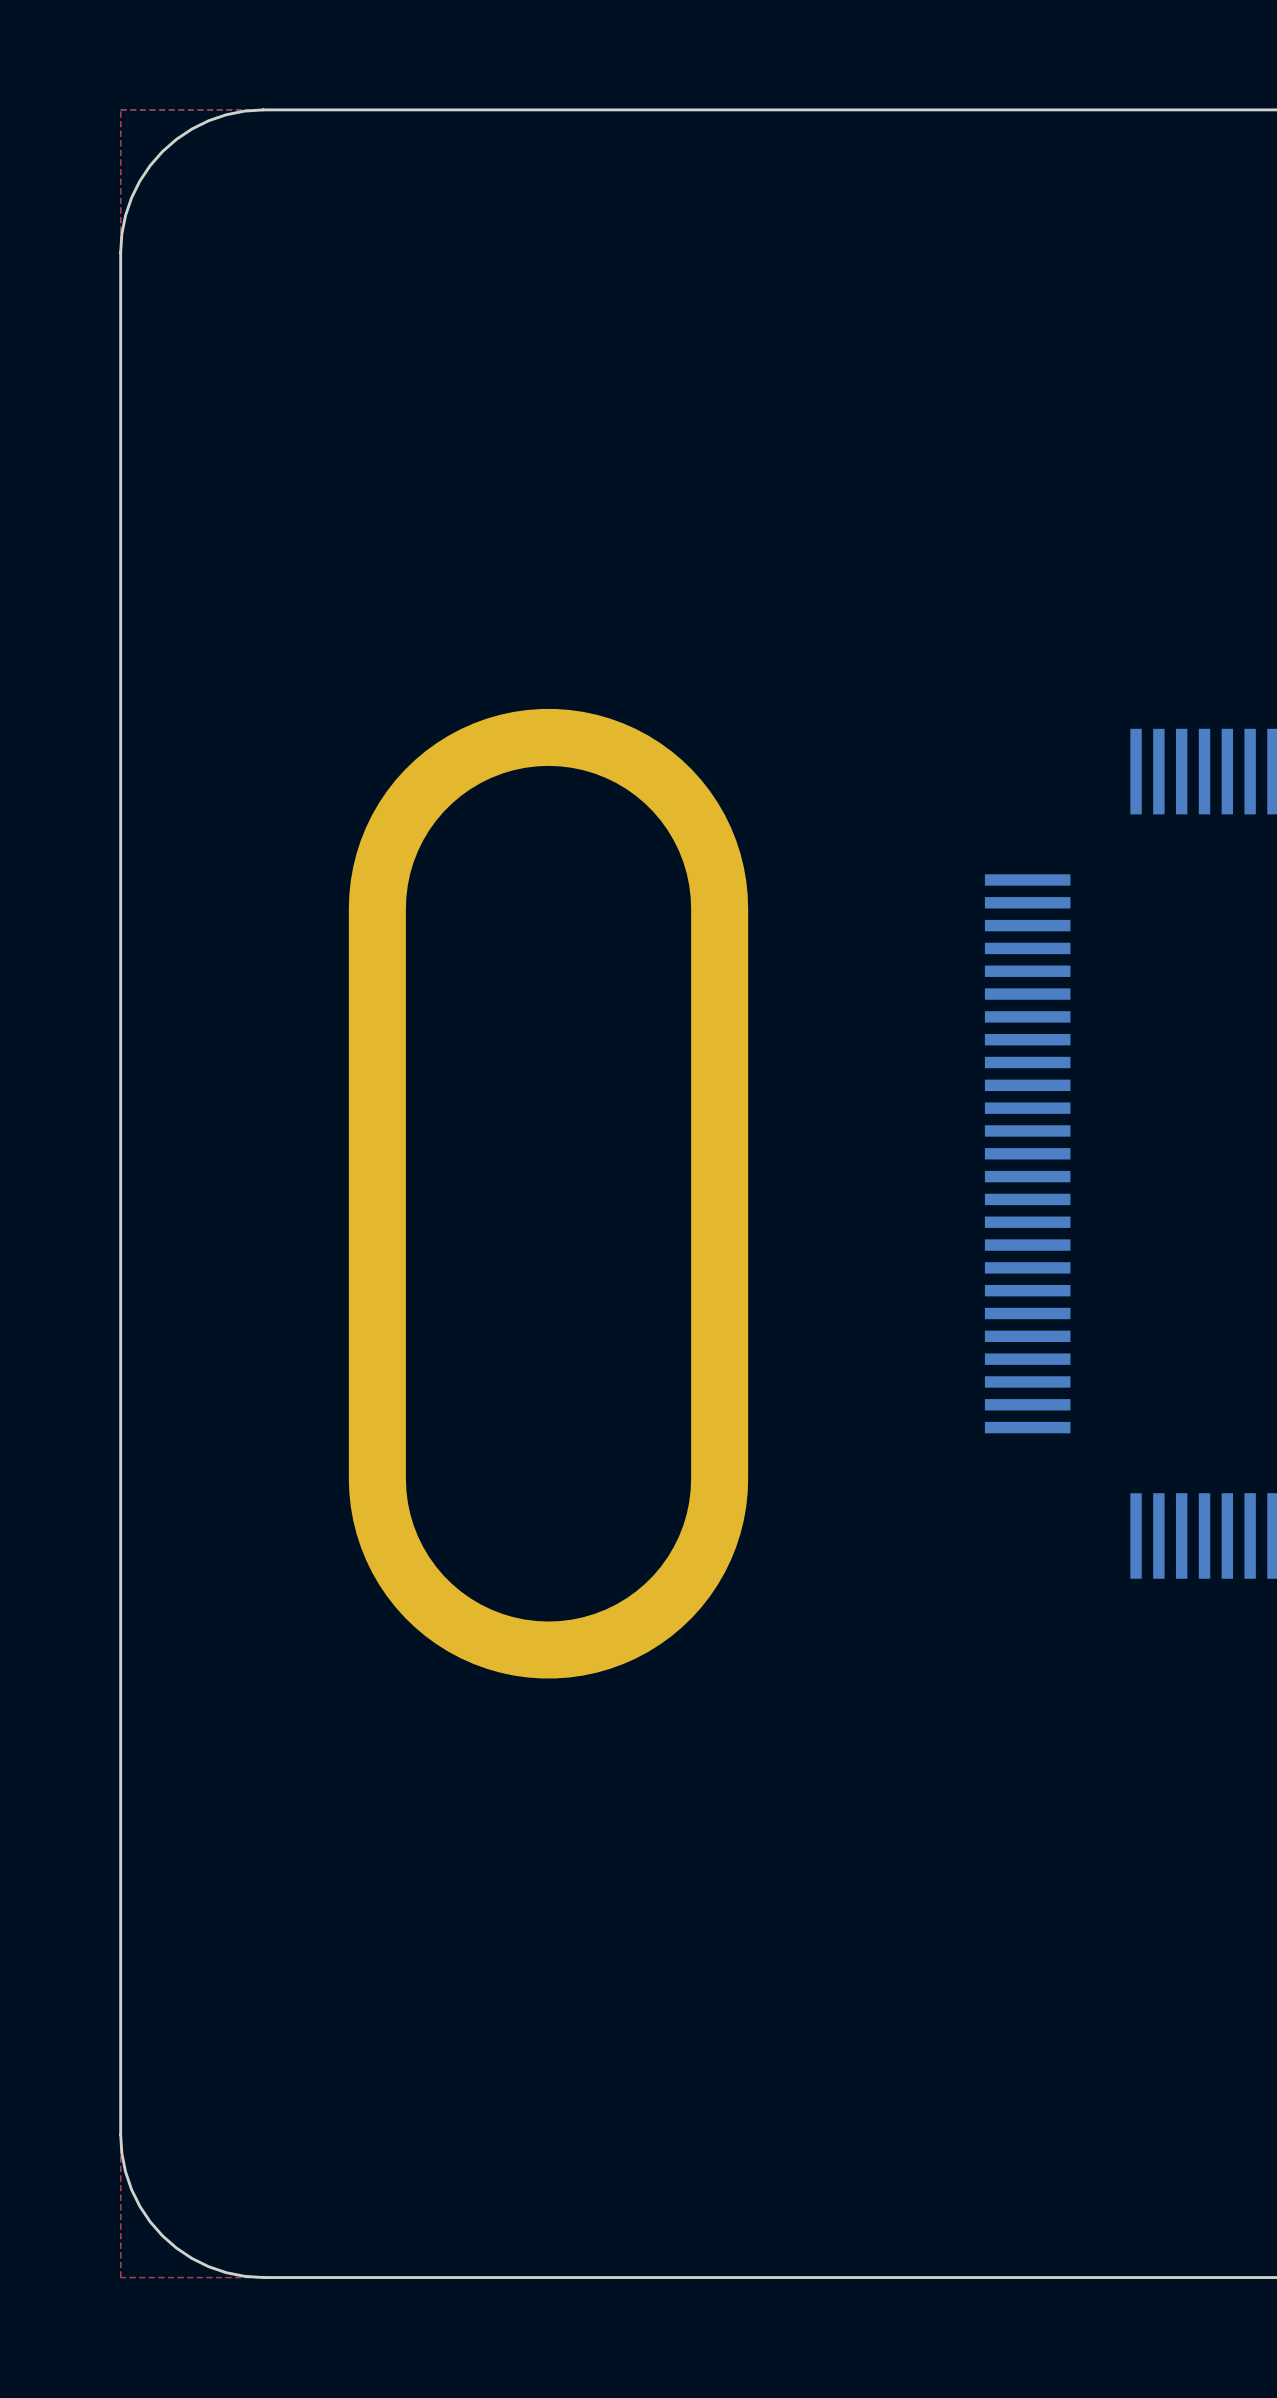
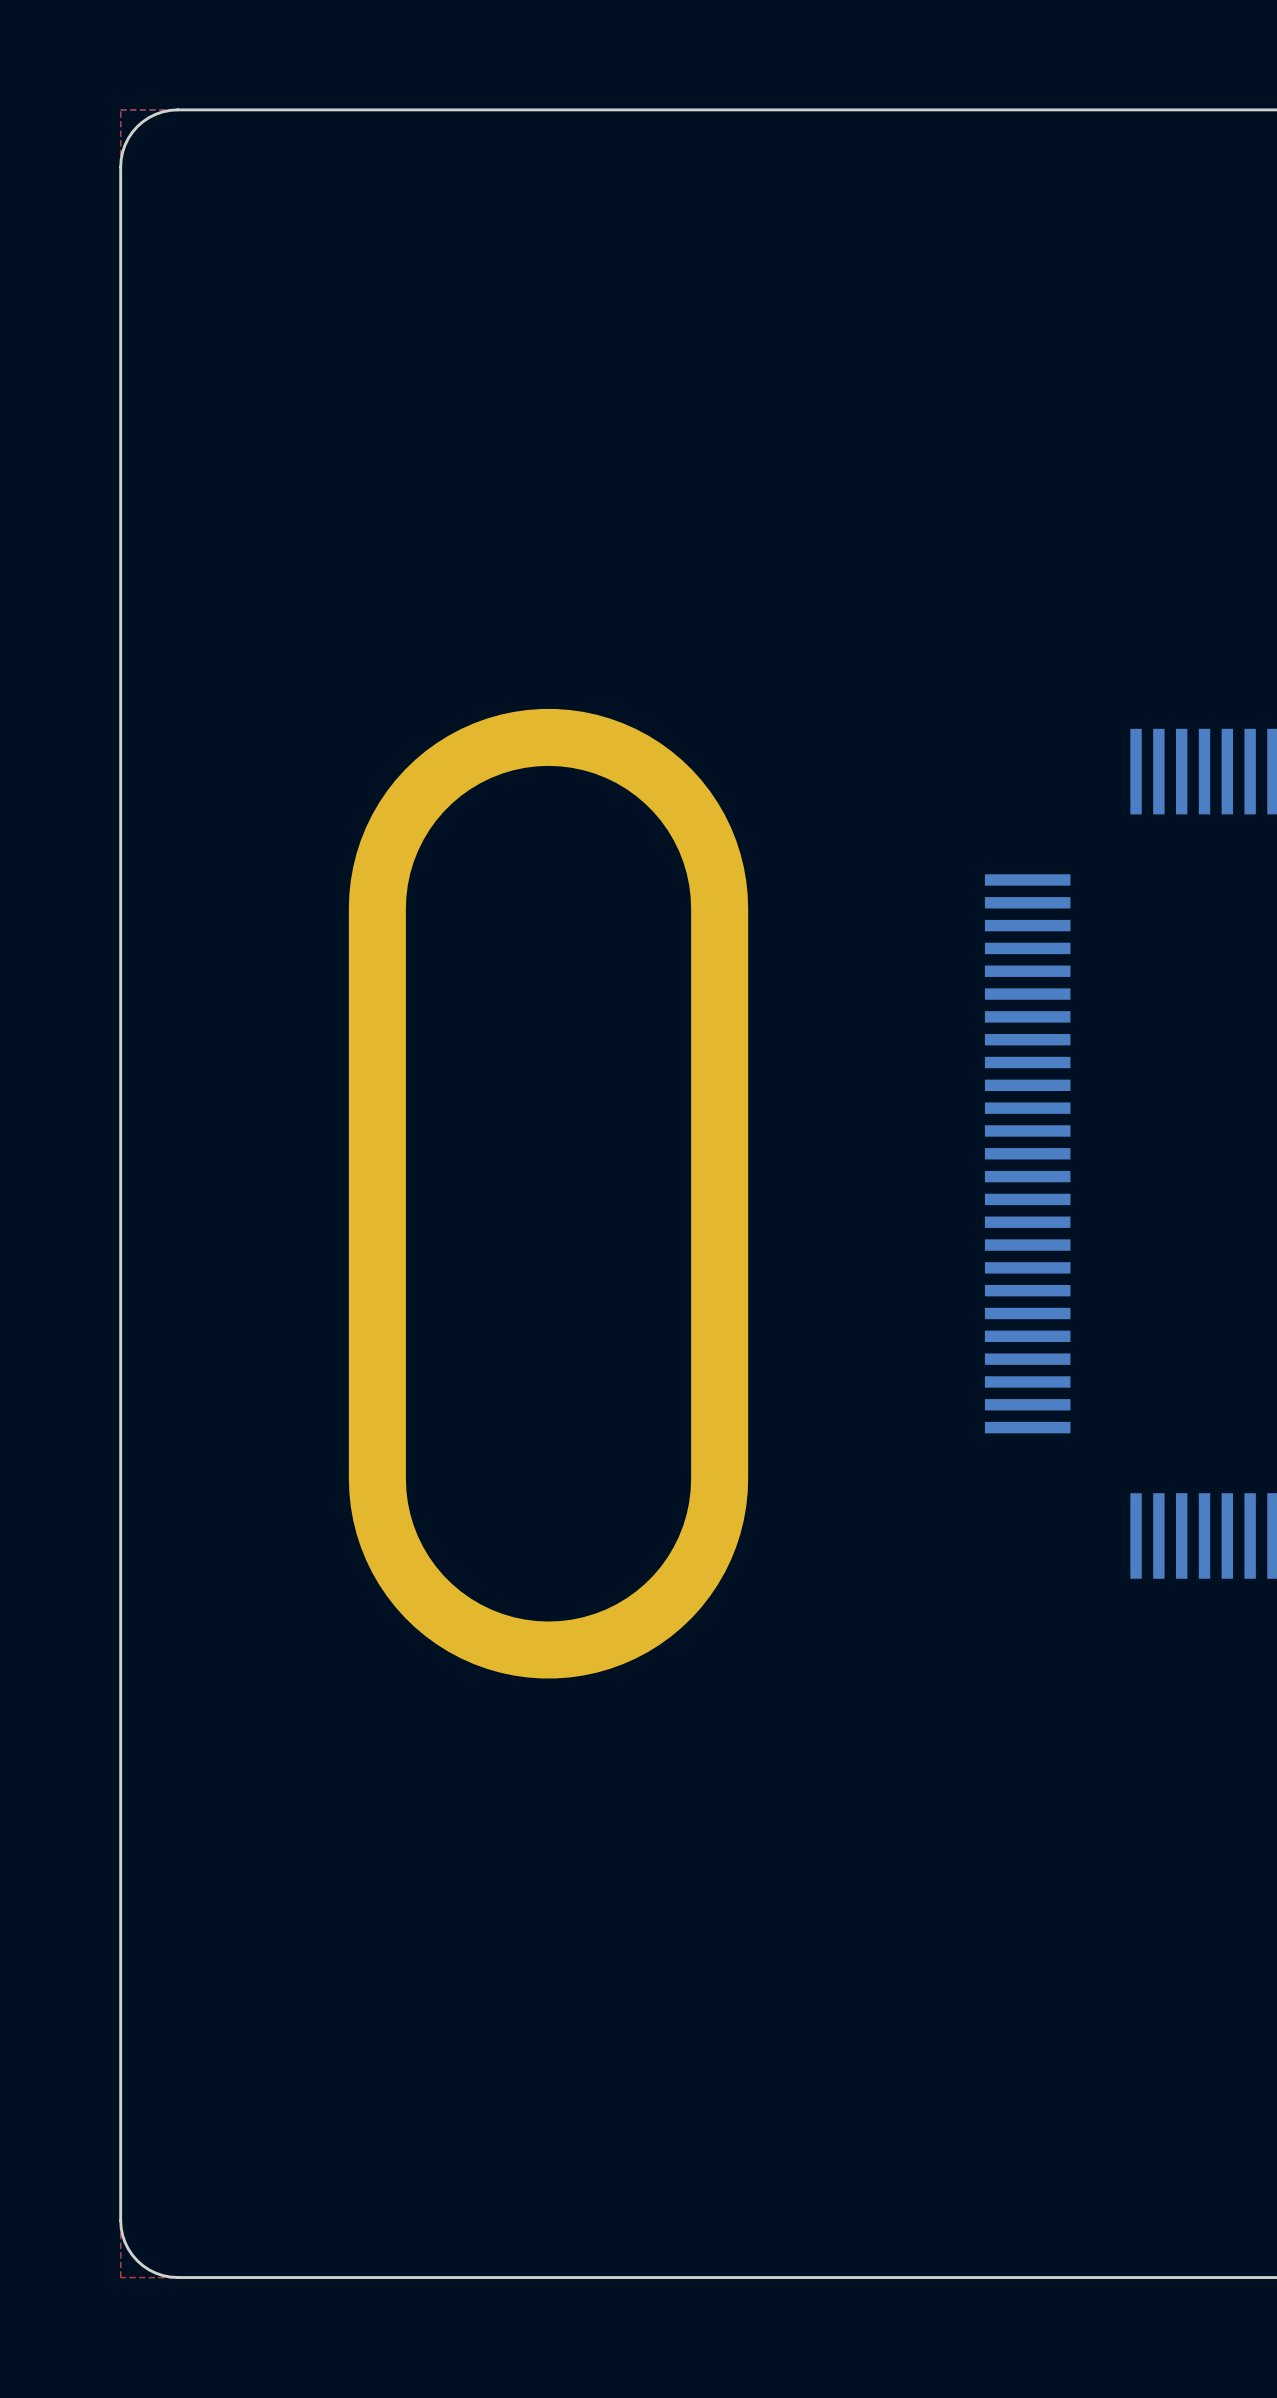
board edge: (263, 109) (244, 111) (208, 120) (176, 139) (162, 151) (150, 165) (131, 197) (121, 233) (120, 252) -> (263, 109) (170, 110) (155, 114) (137, 126) (125, 145) (121, 159) (120, 252)
board edge: (120, 2134) (121, 2153) (131, 2189) (150, 2221) (162, 2235) (191, 2258) (208, 2266) (244, 2276) (263, 2277) -> (120, 2134) (121, 2227) (125, 2242) (137, 2260) (149, 2269) (170, 2277) (263, 2277)

